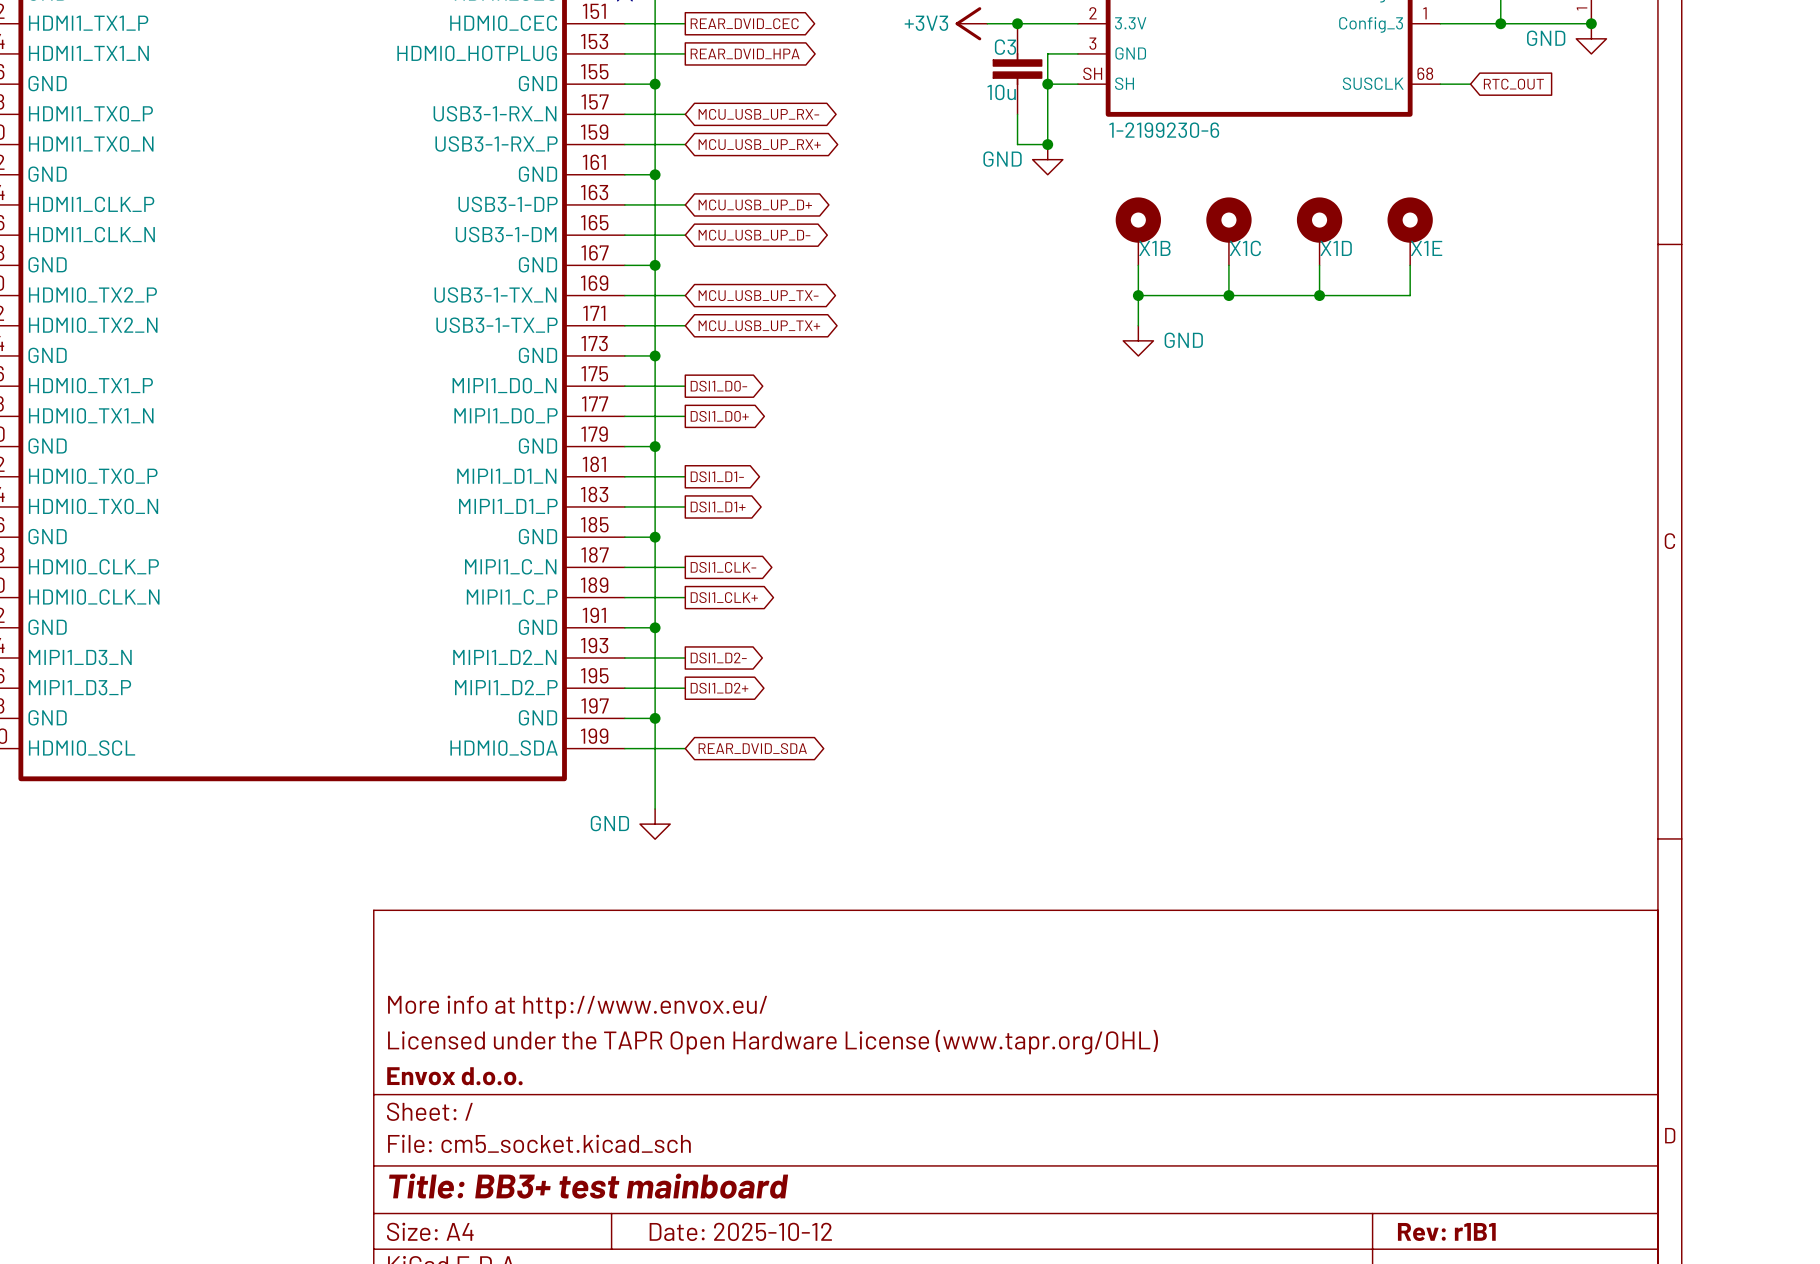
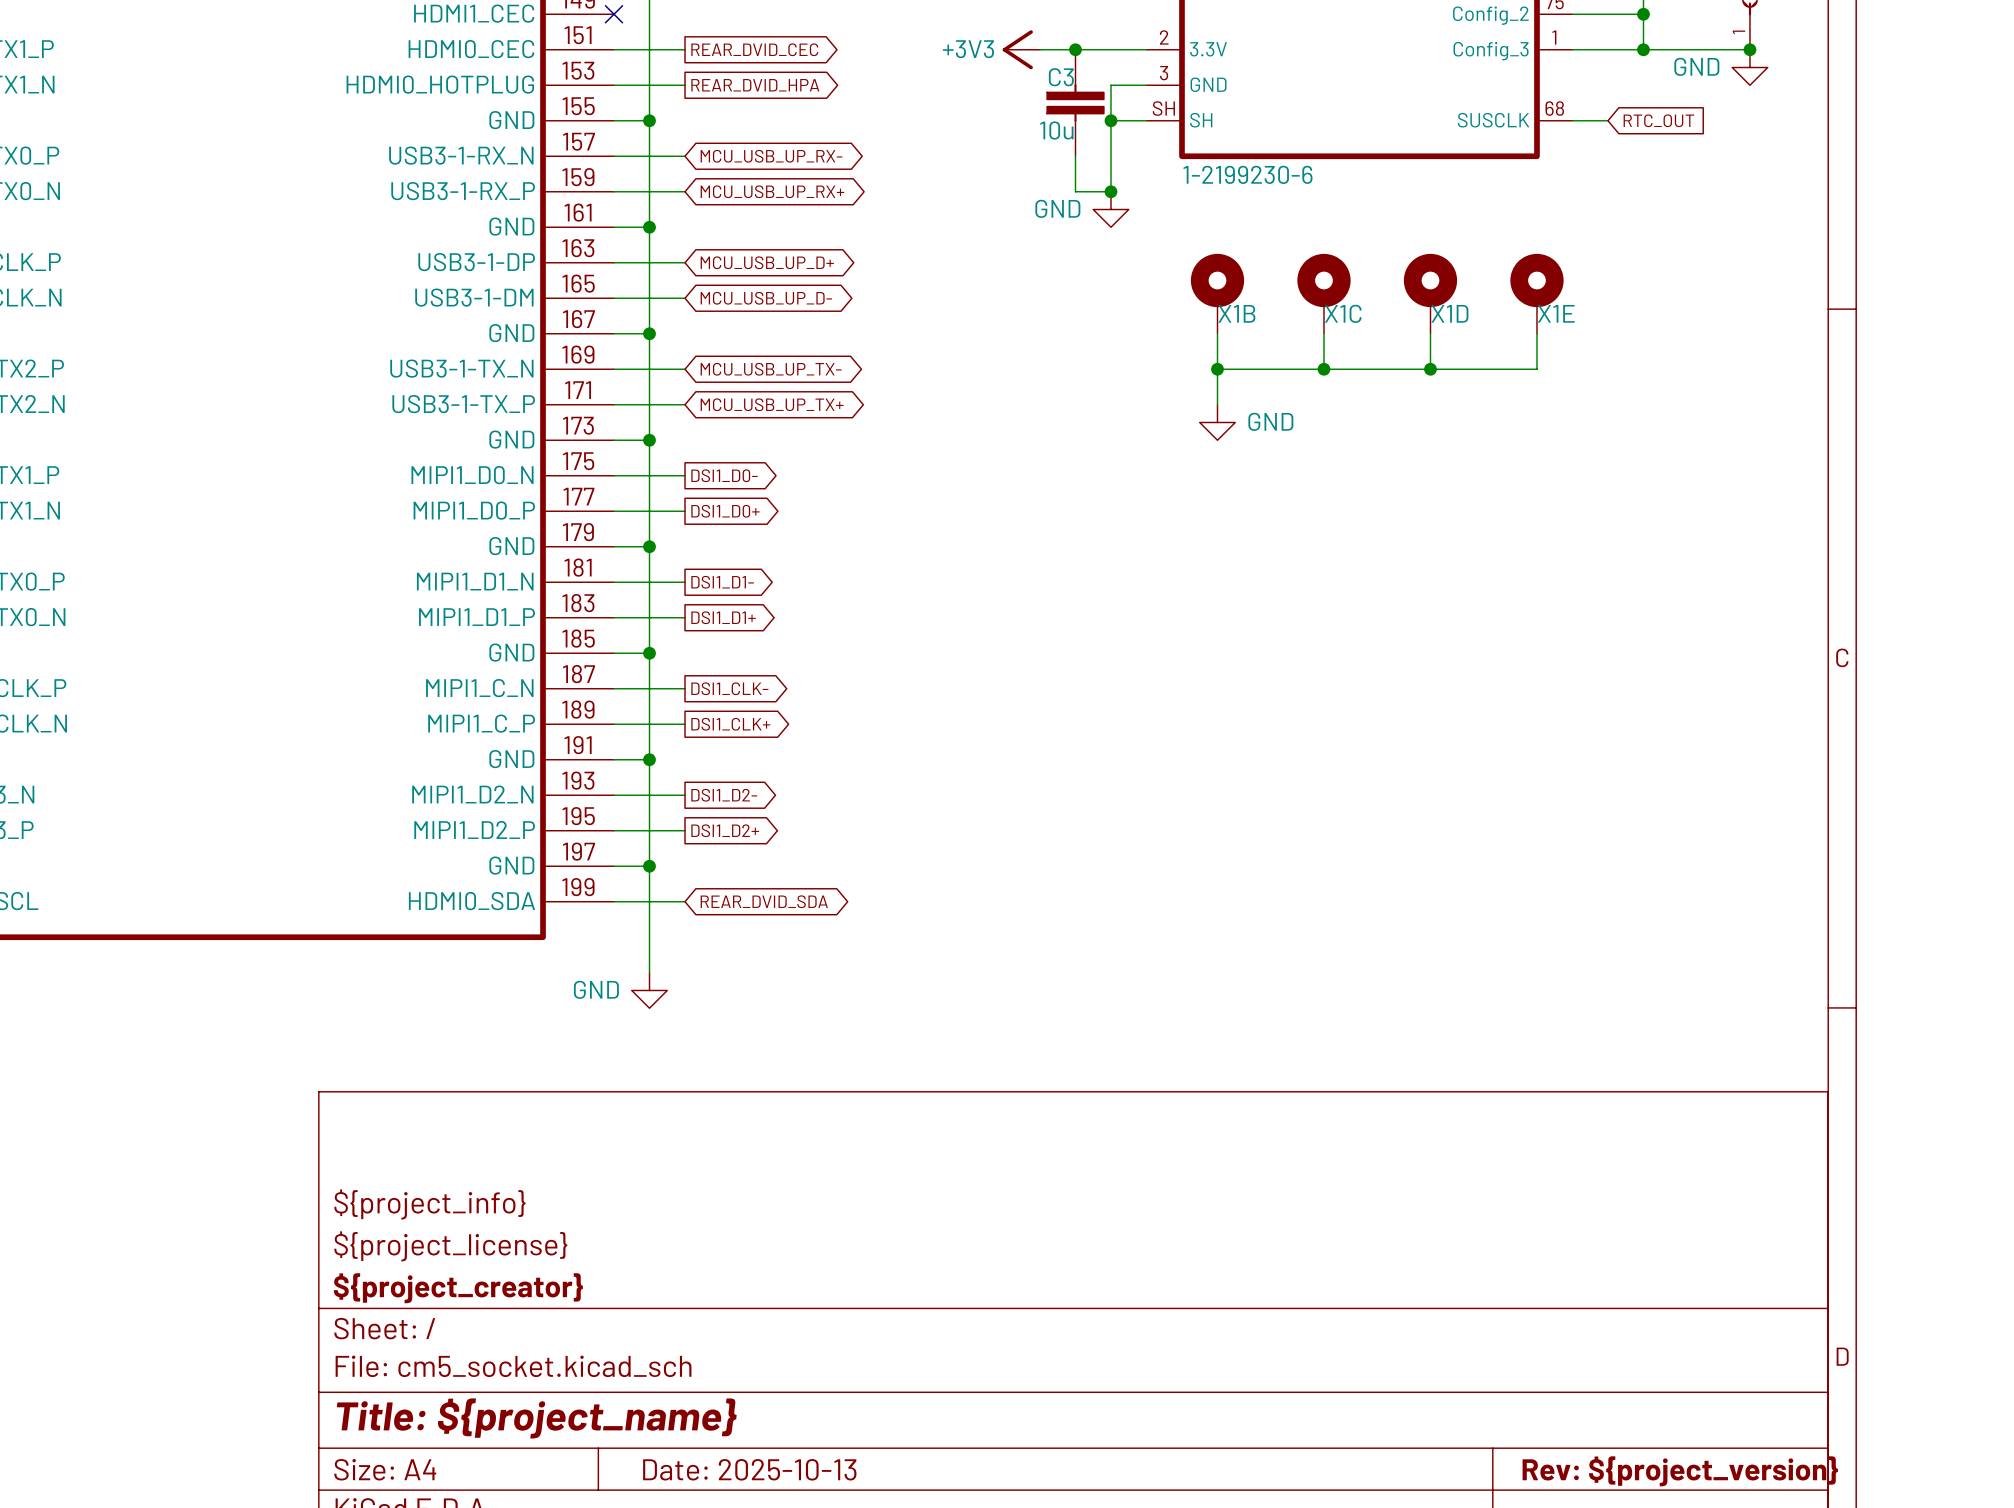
title block: More info at http://www.envox.eu/ (577, 1007) -> ${project_info} (429, 1204)
title block: Licensed under the TAPR Open Hardware License (www.tapr.org/OHL) (773, 1042) -> ${project_license} (450, 1246)
title block: Envox d.o.o. (454, 1076) -> ${project_creator} (458, 1288)
title block: Title: BB3+ test mainboard (588, 1186) -> Title: ${project_name} (536, 1418)
title block: Date: 2025-10-12 (740, 1231) -> Date: 2025-10-13 (749, 1469)
title block: Rev: r1B1 (1446, 1231) -> Rev: ${project_version} (1680, 1471)

